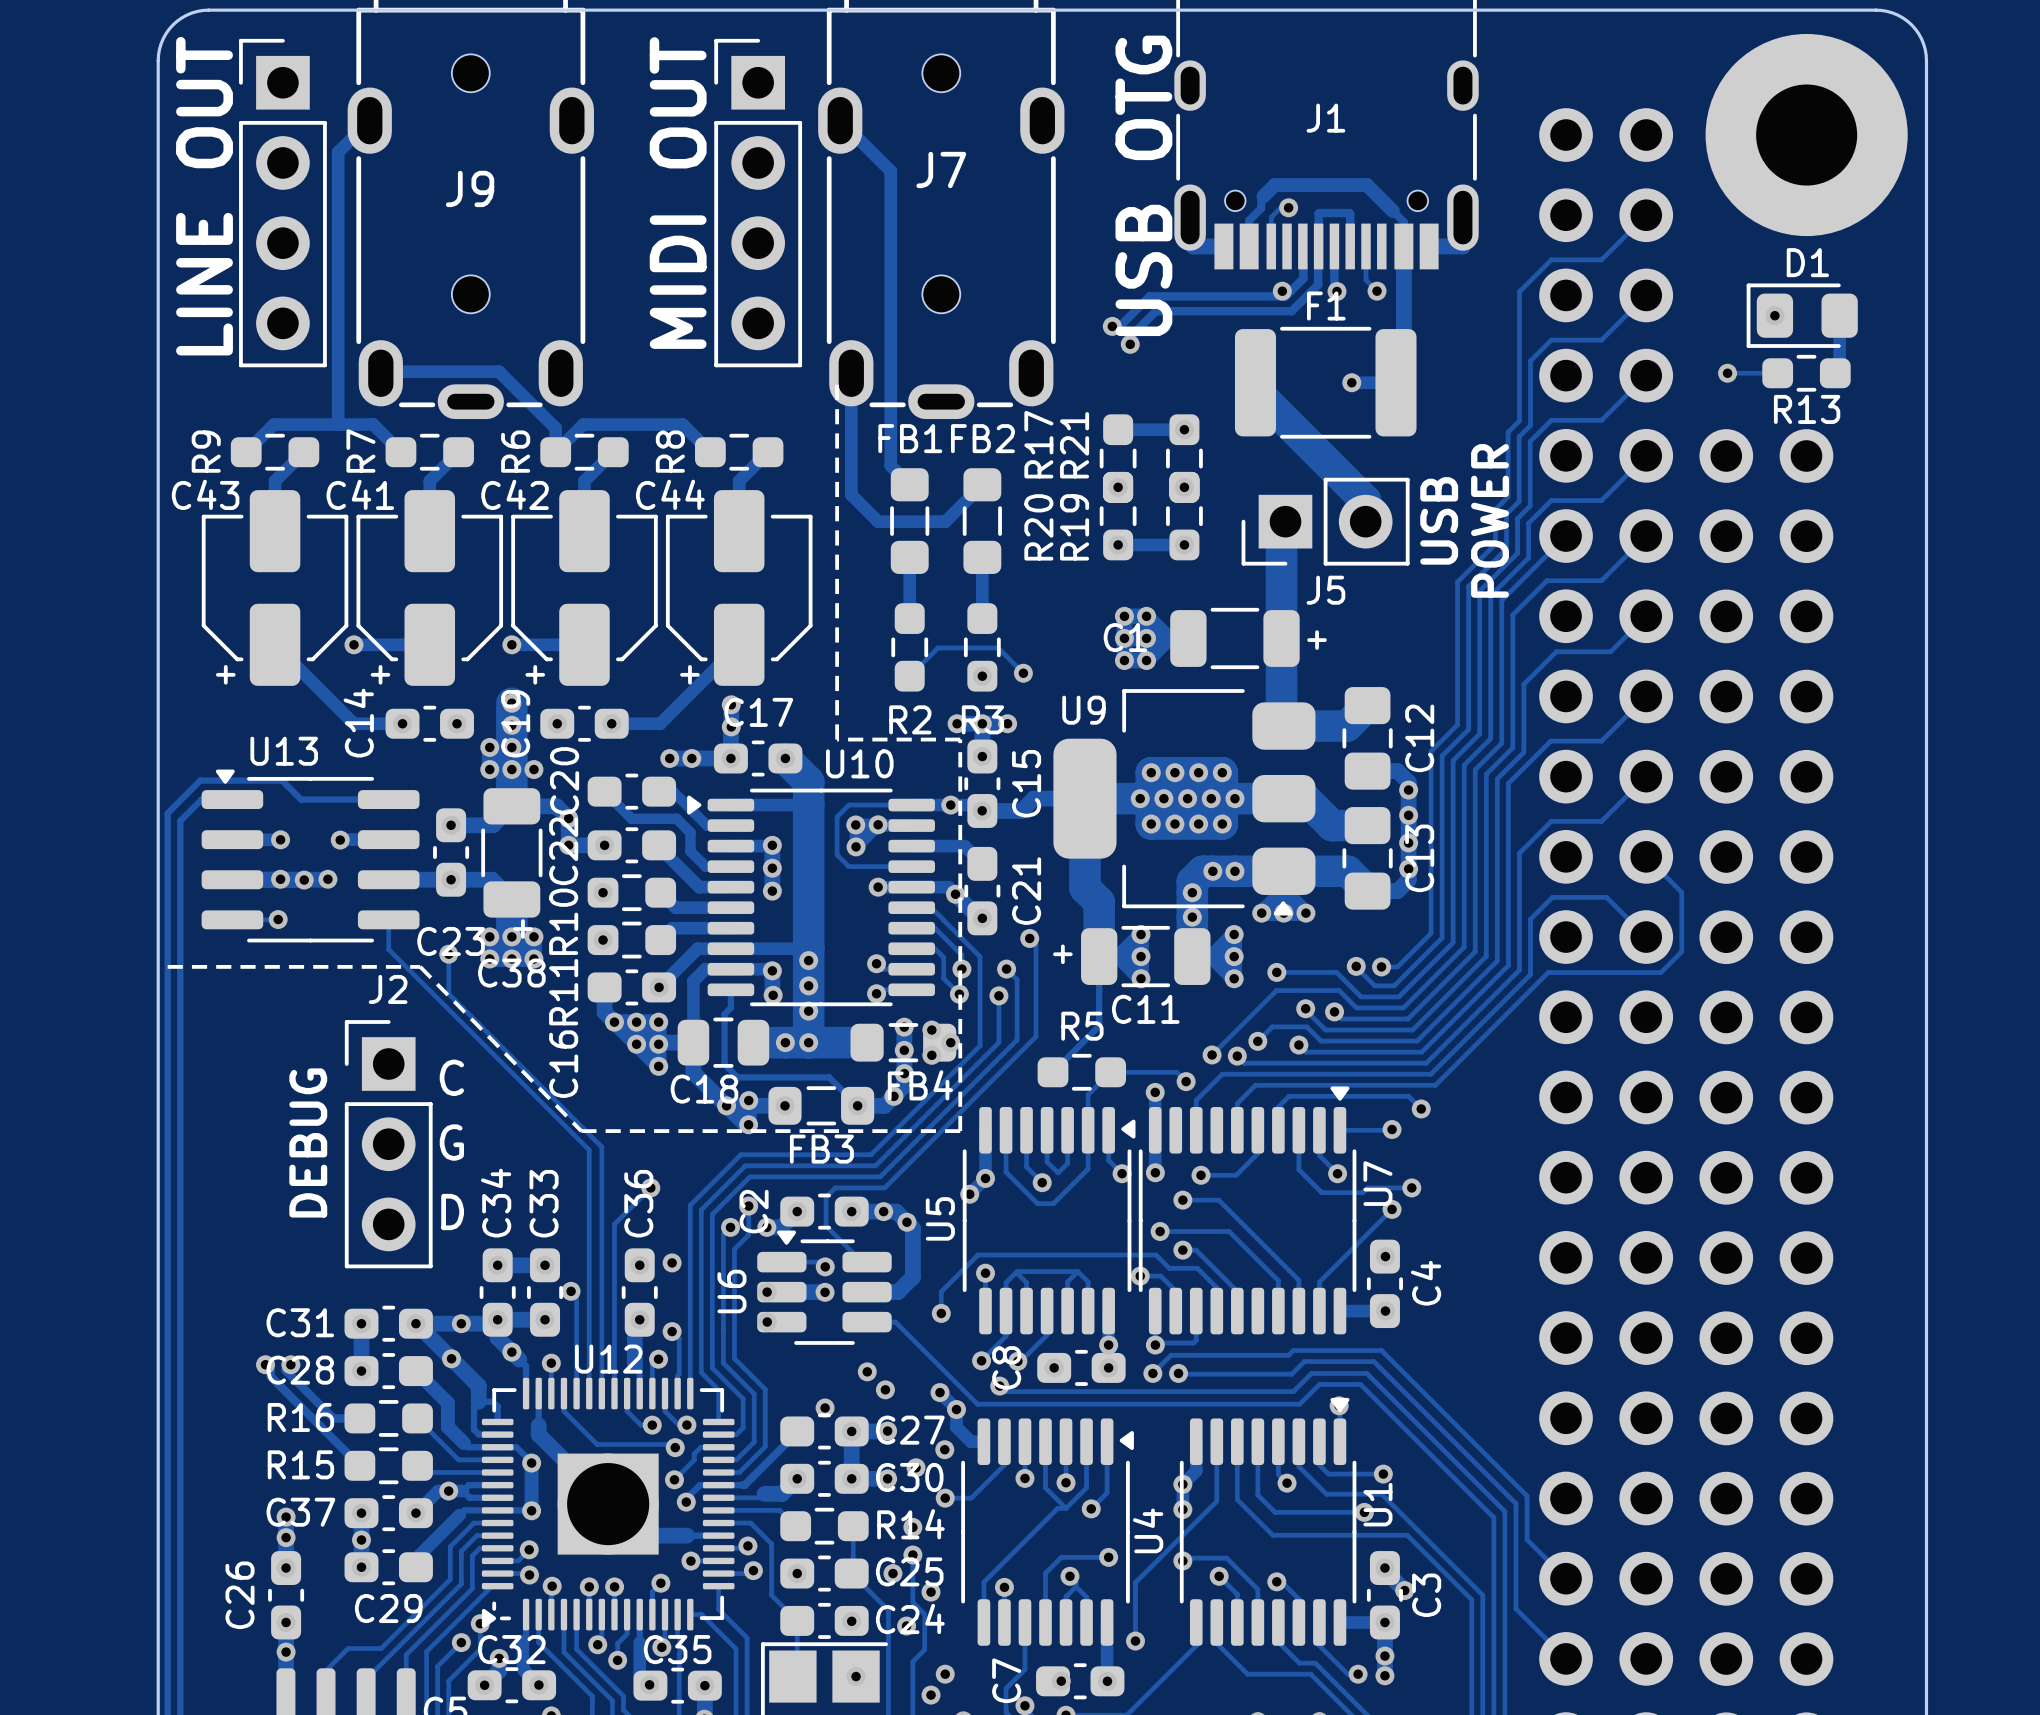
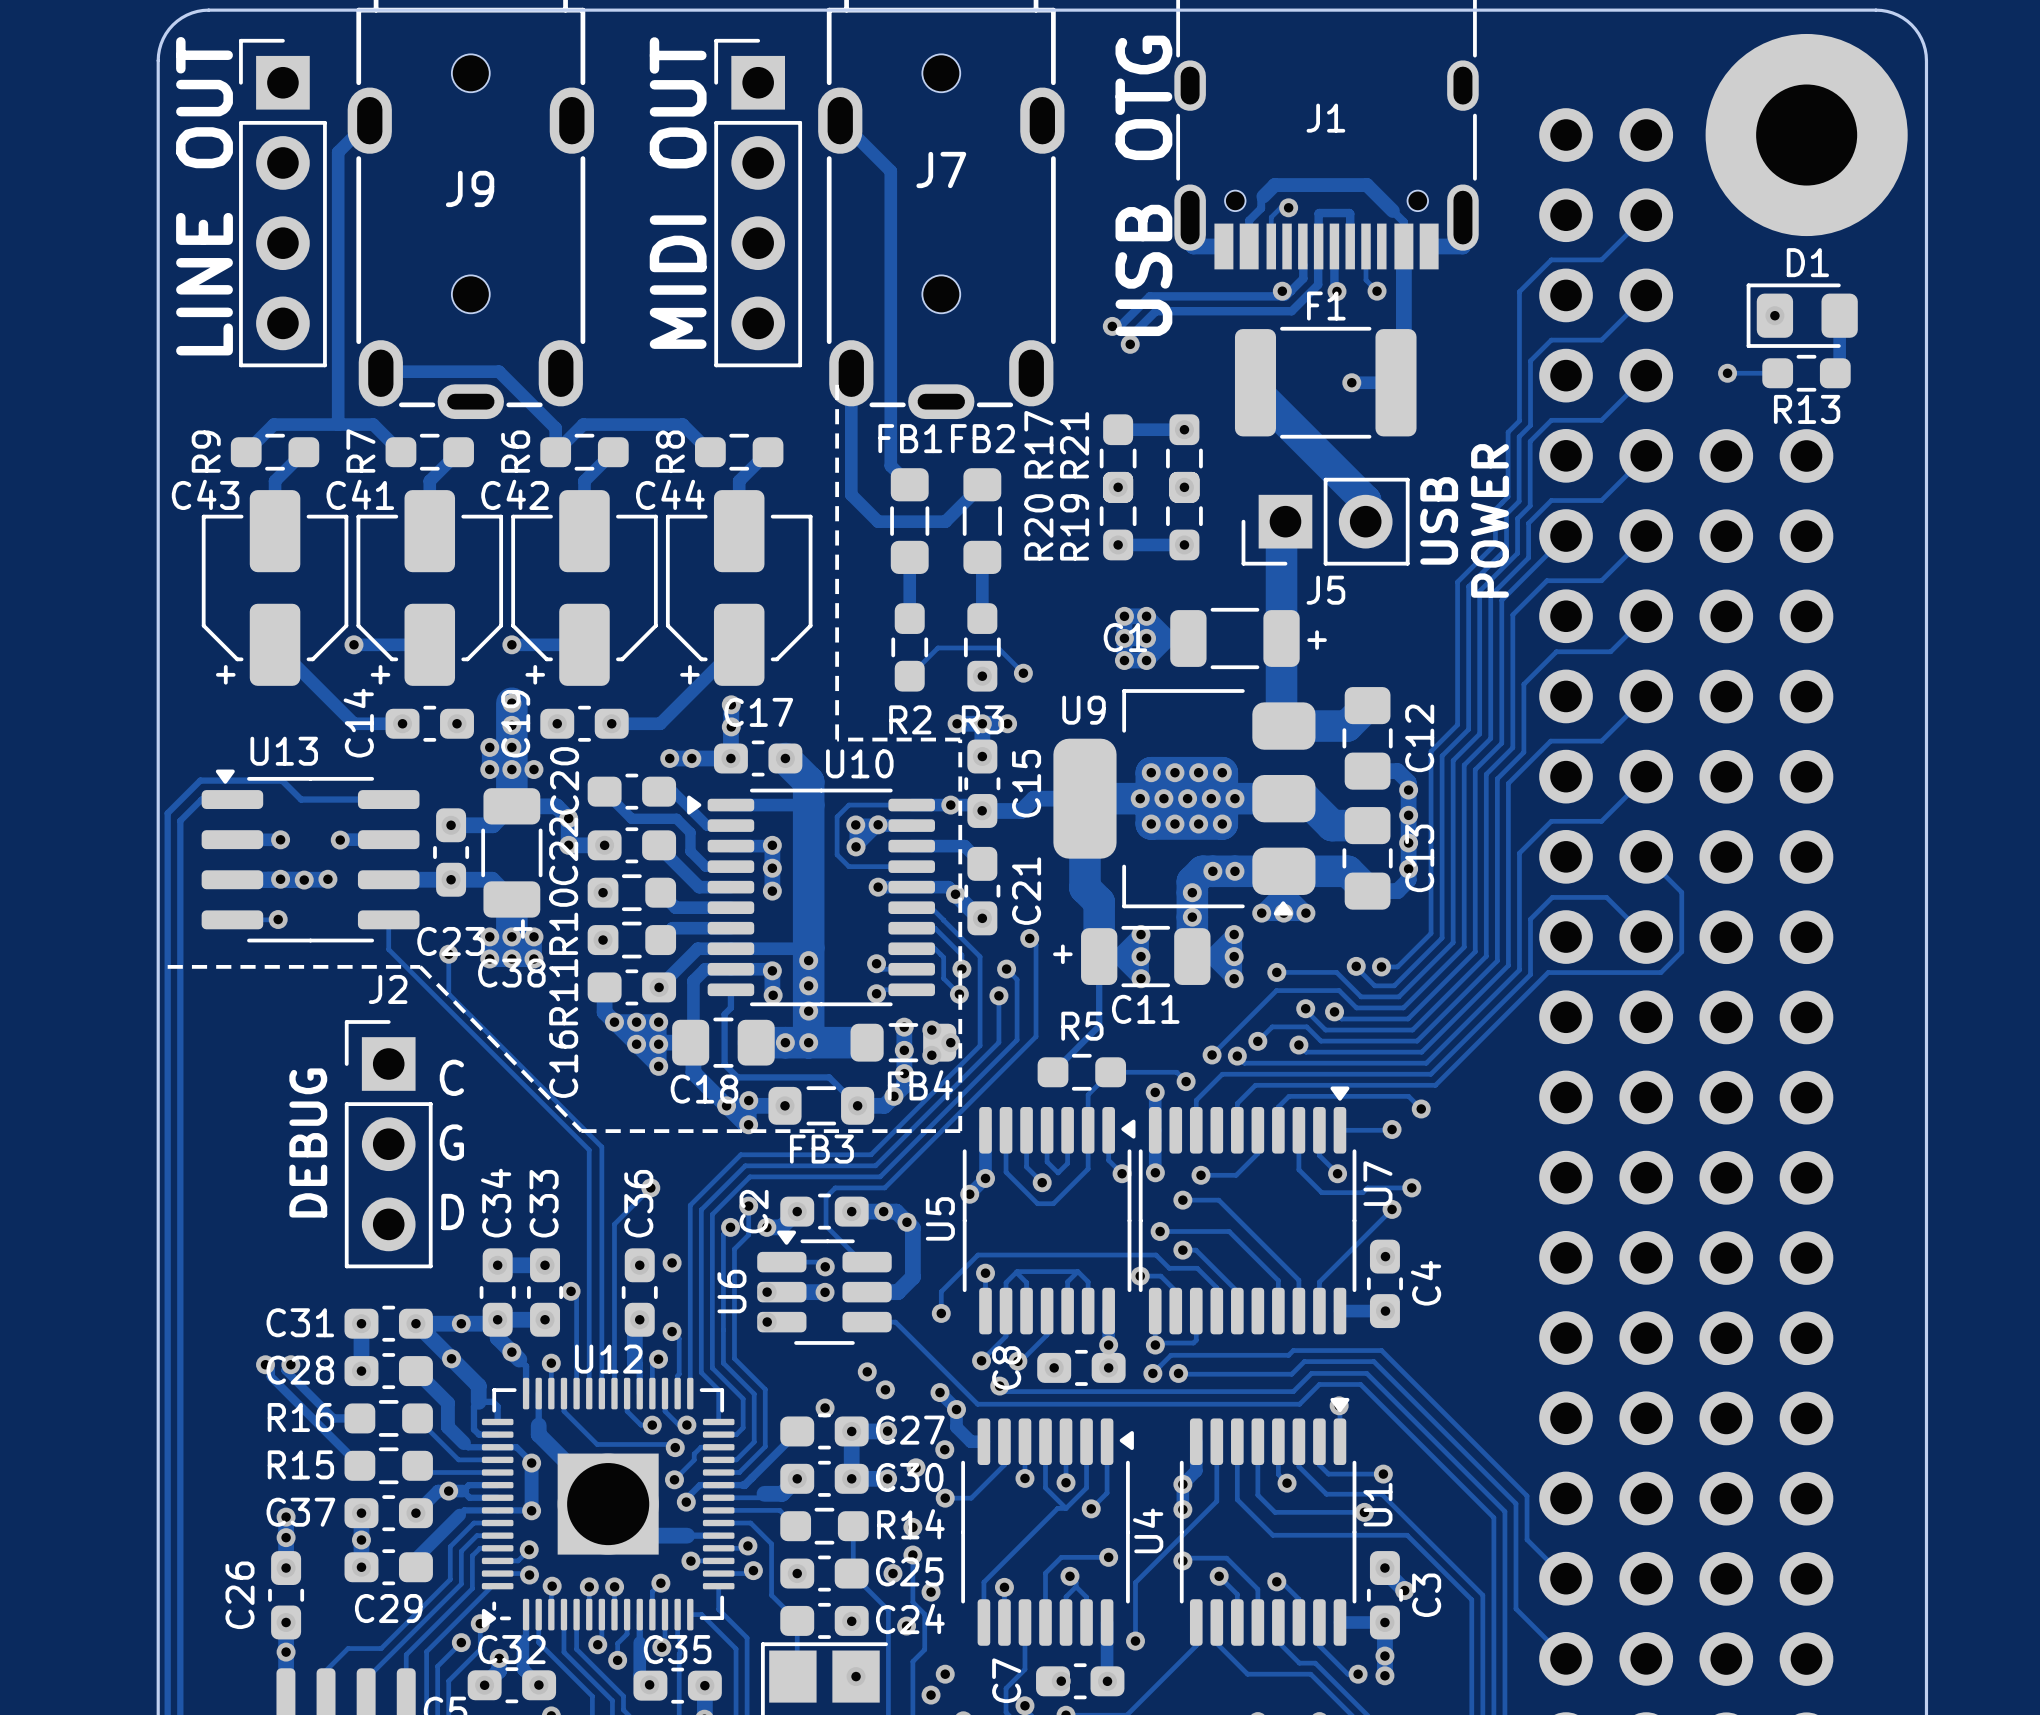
C18 footprint: [677, 1017, 770, 1068] -> [672, 1017, 775, 1068]

